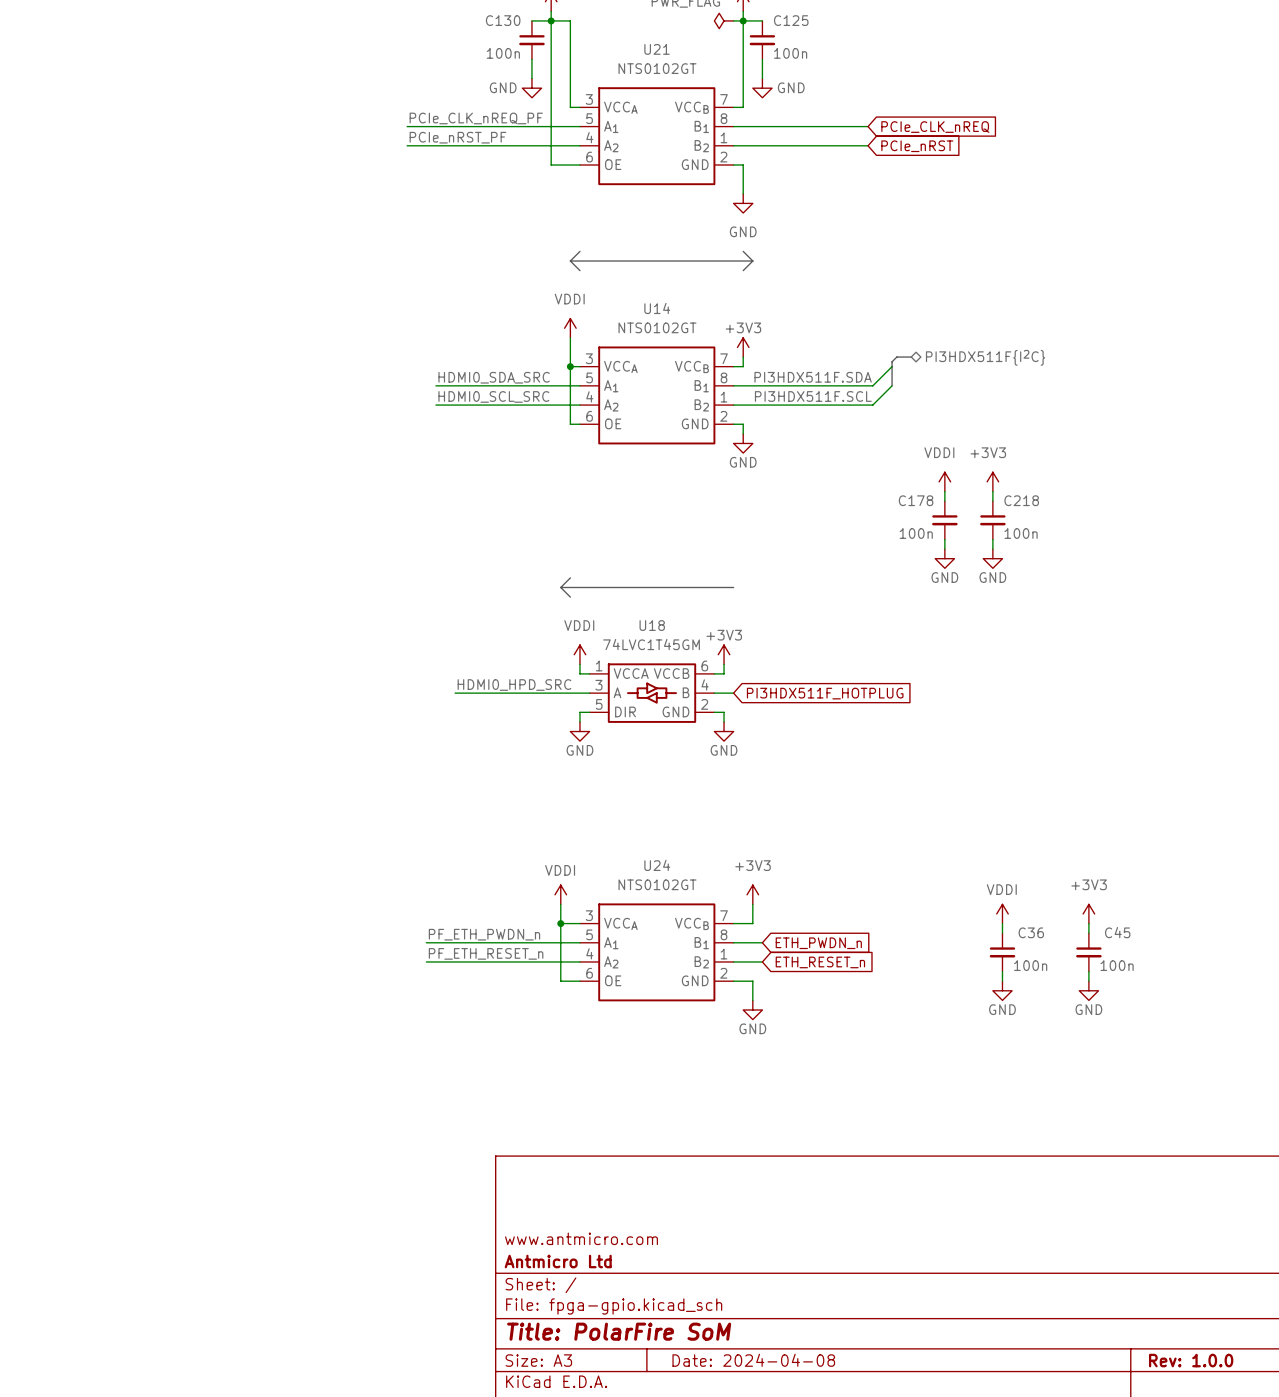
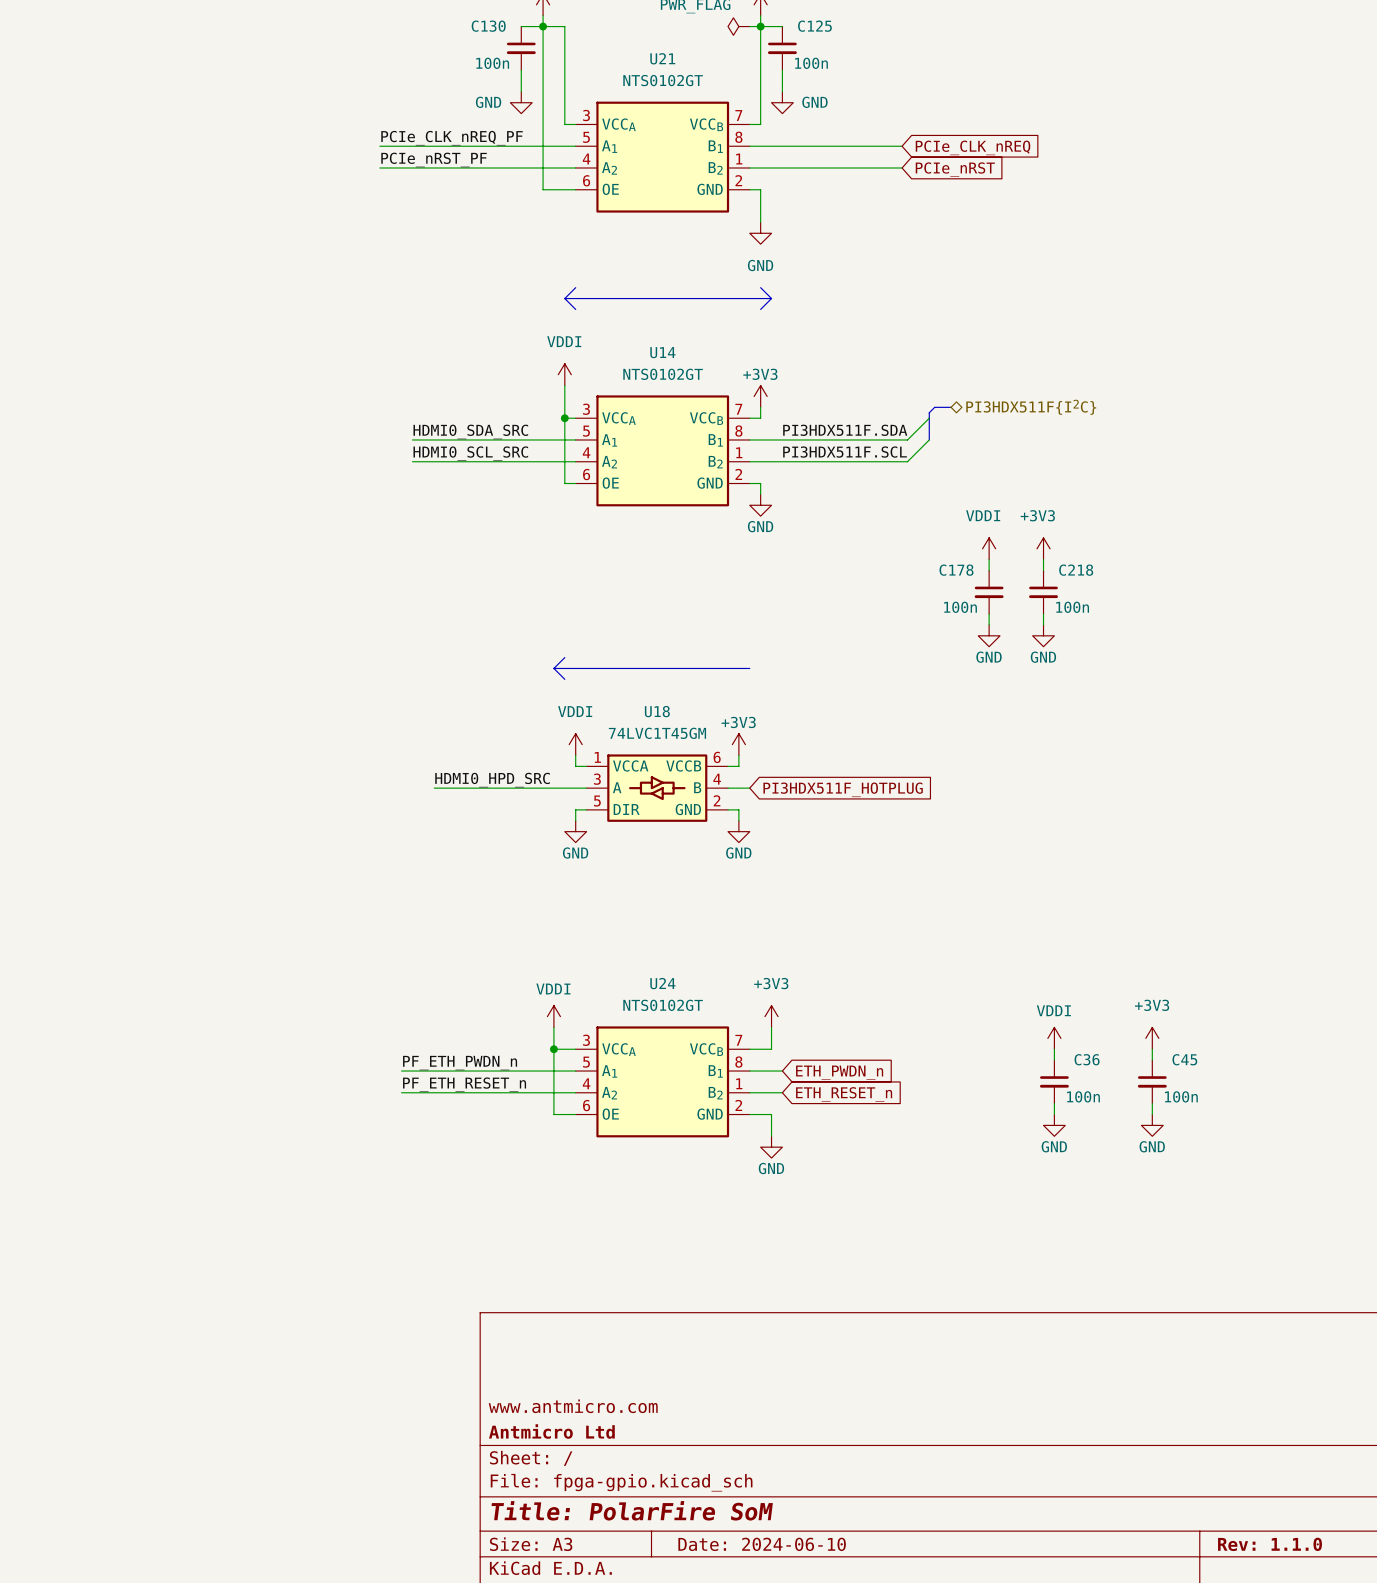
title block: Date: 2024-04-08 (753, 1360) -> Date: 2024-06-10 (762, 1544)
title block: Rev: 1.0.0 (1191, 1360) -> Rev: 1.1.0 (1270, 1544)

